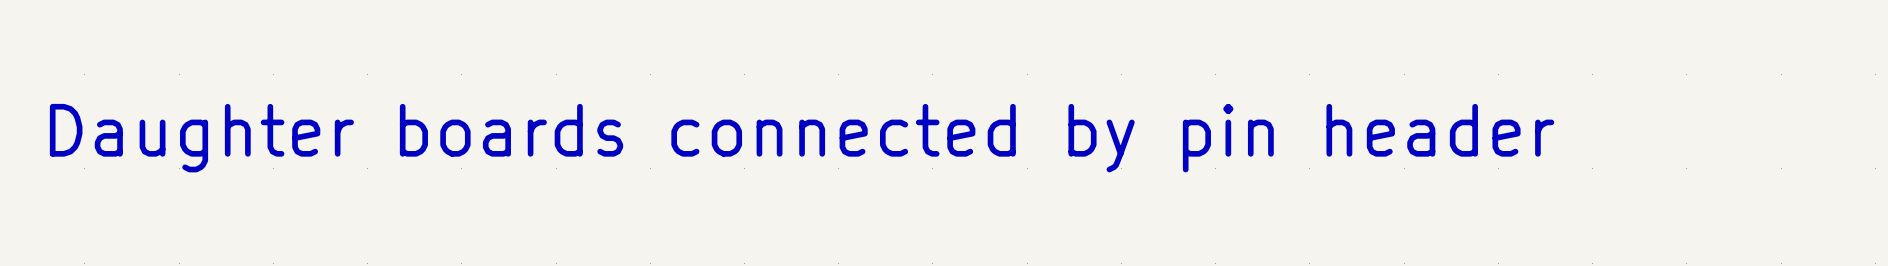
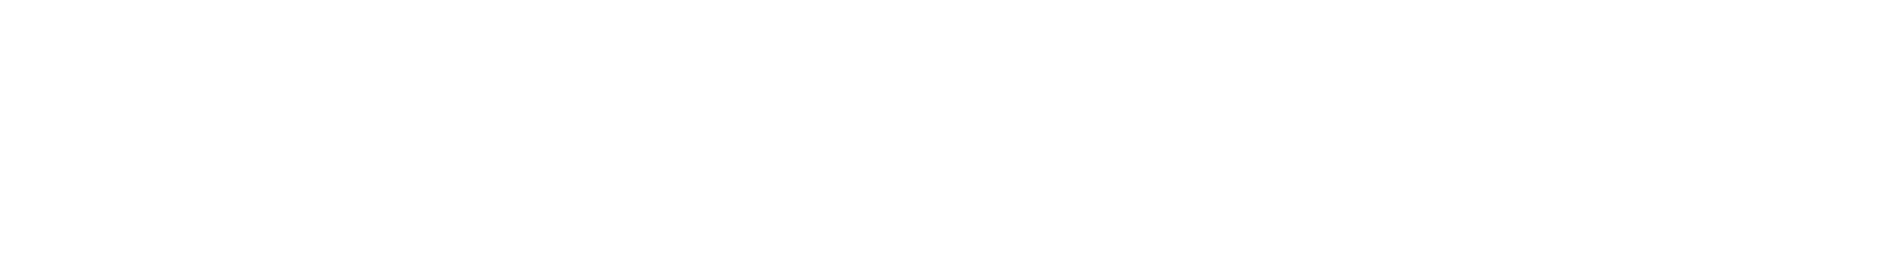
text: Daughter boards connected by pin header (802, 138) -> none

